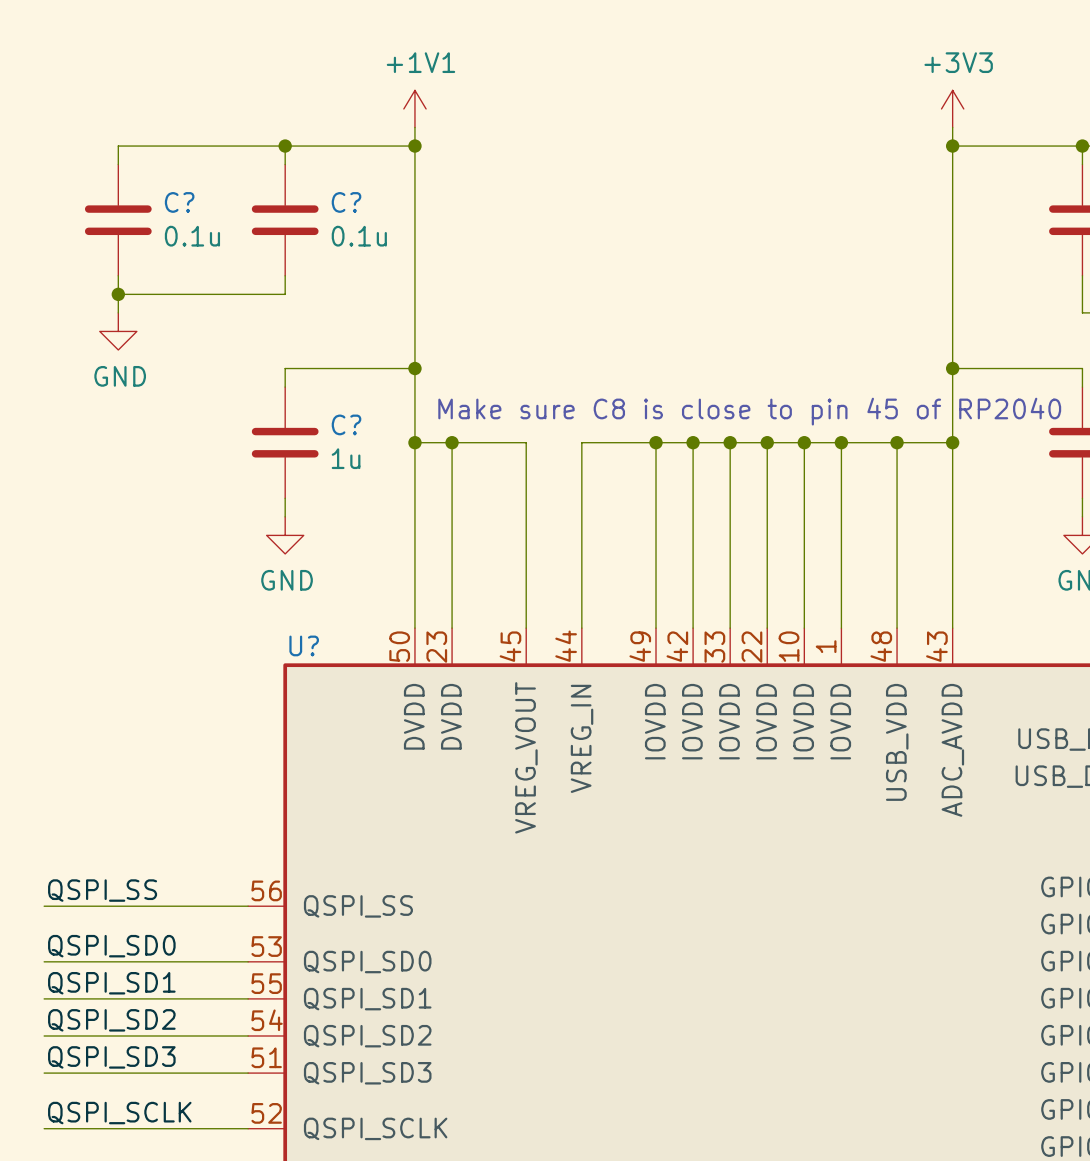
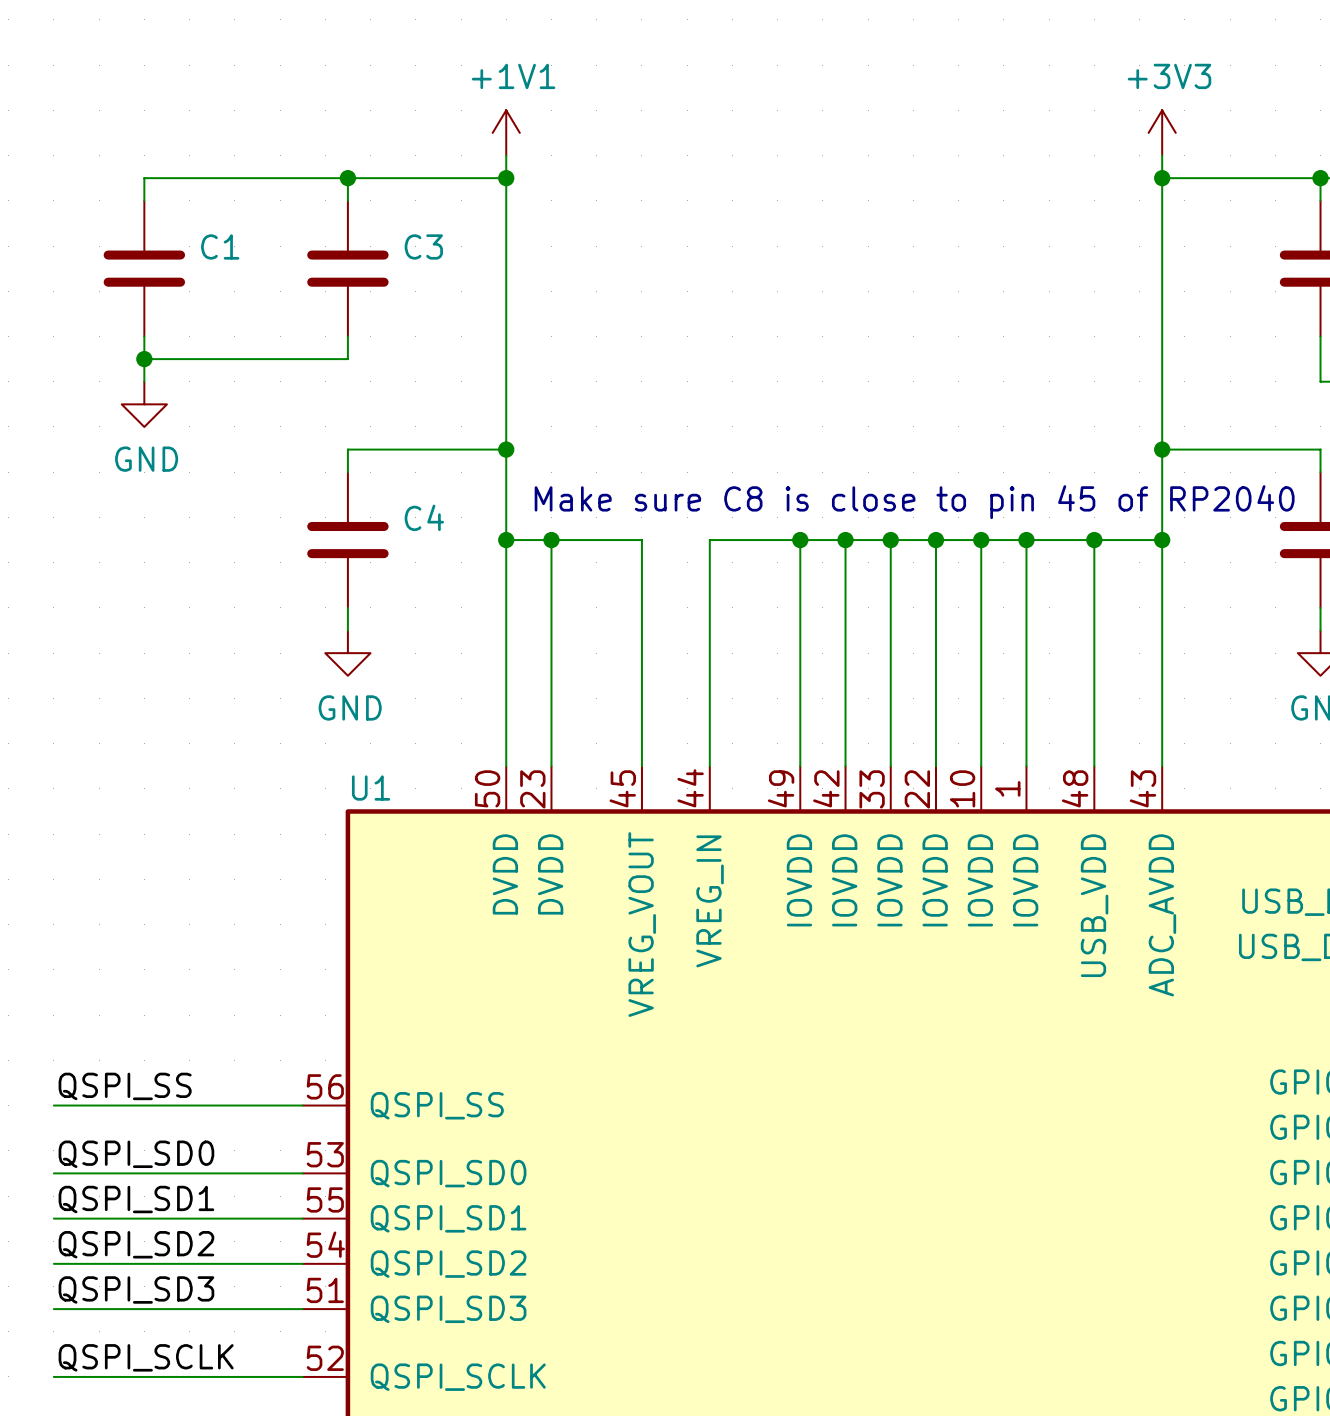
C? name: C? (179, 202) -> C1 (220, 246)
C? name: C? (346, 202) -> C3 (423, 246)
C? value: 0.1u (192, 236) -> none
C? value: 0.1u (359, 236) -> none
C? name: C? (346, 424) -> C4 (424, 517)
C? value: 1u (346, 458) -> none
U? name: U? (304, 645) -> U1 (371, 788)

